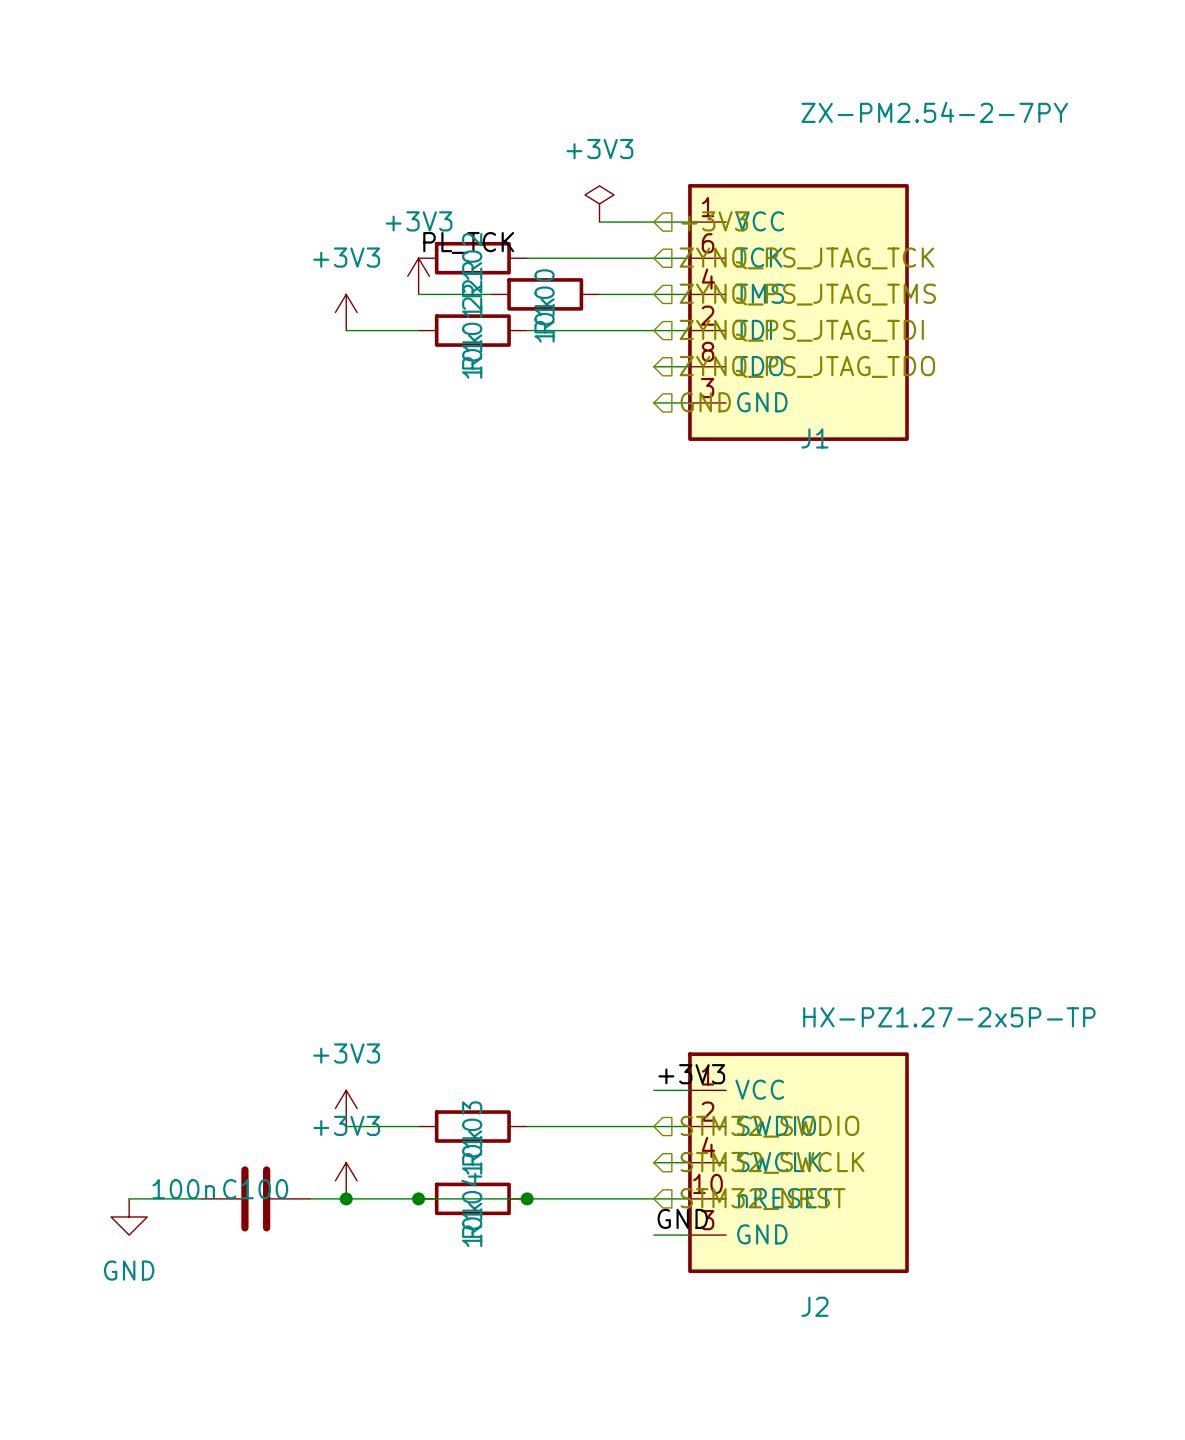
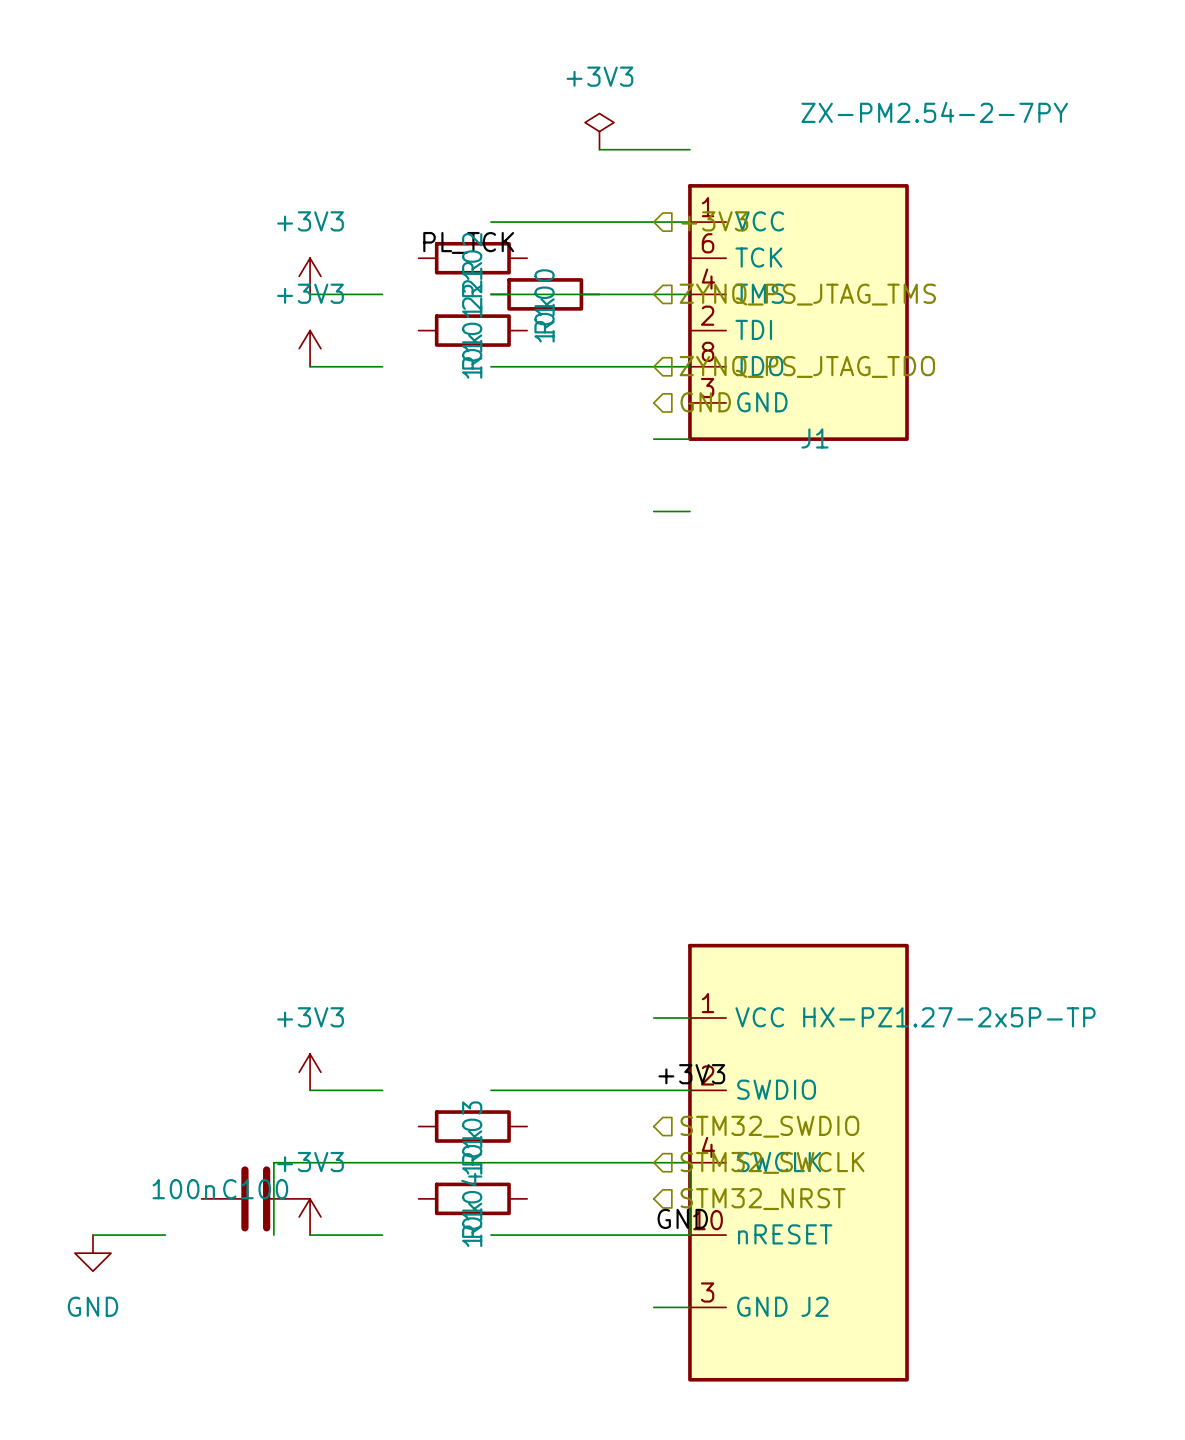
wire: none -> (599, 149) (689, 149)
power symbol position: +3V3 (599, 203) -> +3V3 (599, 131)
wire: none -> (490, 222) (599, 222)
wire: (527, 258) (689, 258) -> none
hierarchical label: ZYNQ_PS_JTAG_TCK (806, 258) -> none
power symbol: none -> +3V3 (310, 276)
power symbol: +3V3 (418, 276) -> none
wire: (418, 294) (490, 294) -> (599, 294) (490, 294)
power symbol: +3V3 (346, 312) -> none
wire: (346, 330) (418, 330) -> (310, 294) (382, 294)
wire: (527, 330) (689, 330) -> (490, 366) (653, 366)
hierarchical label: ZYNQ_PS_JTAG_TDI (801, 330) -> none
power symbol: none -> +3V3 (310, 348)
wire: none -> (310, 366) (382, 366)
wire: (653, 402) (689, 402) -> (653, 439) (689, 439)
wire: none -> (653, 511) (689, 511)
wire: none -> (653, 1018) (689, 1018)
J2 symbol: [688, 1052, 909, 1274] -> [688, 943, 909, 1382]
power symbol position: +3V3 (346, 1108) -> +3V3 (310, 1072)
wire: (346, 1126) (418, 1126) -> (310, 1090) (382, 1090)
wire: (527, 1126) (689, 1126) -> (490, 1090) (653, 1090)
wire: none -> (653, 1162) (273, 1162) (273, 1235)
power symbol position: +3V3 (346, 1180) -> +3V3 (310, 1216)
wire: (129, 1198) (201, 1198) -> (92, 1235) (165, 1235)
wire: (310, 1198) (689, 1198) -> none
junction: (346, 1198) -> none
junction: (418, 1198) -> none
junction: (527, 1198) -> none
power symbol position: GND (129, 1216) -> GND (92, 1253)
wire: none -> (310, 1235) (382, 1235)
wire: none -> (490, 1235) (653, 1235)
wire: none -> (653, 1307) (689, 1307)

